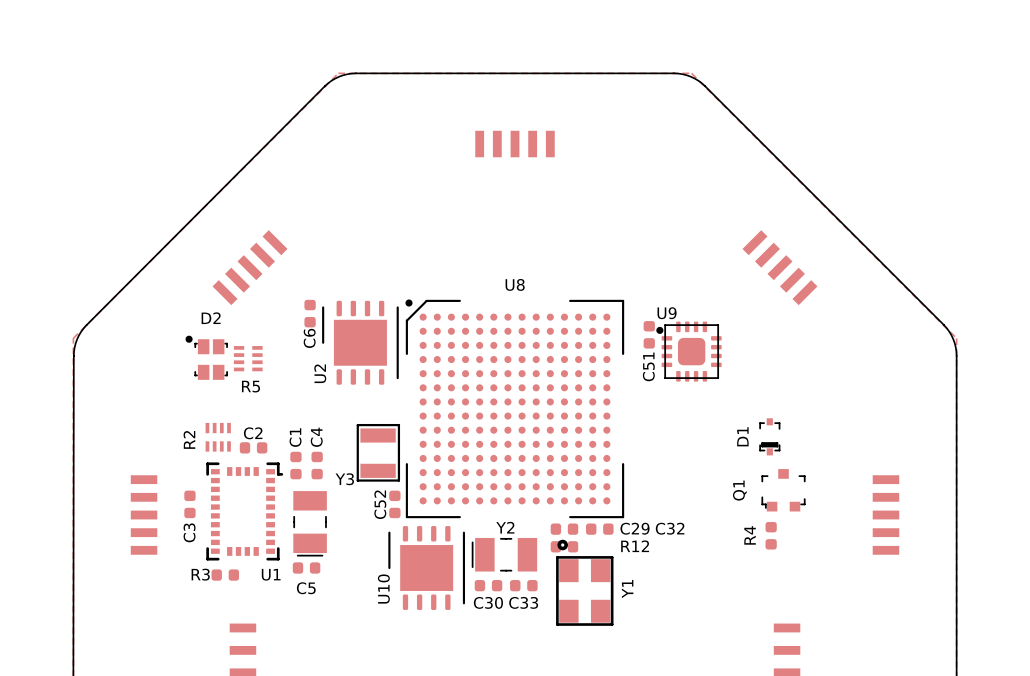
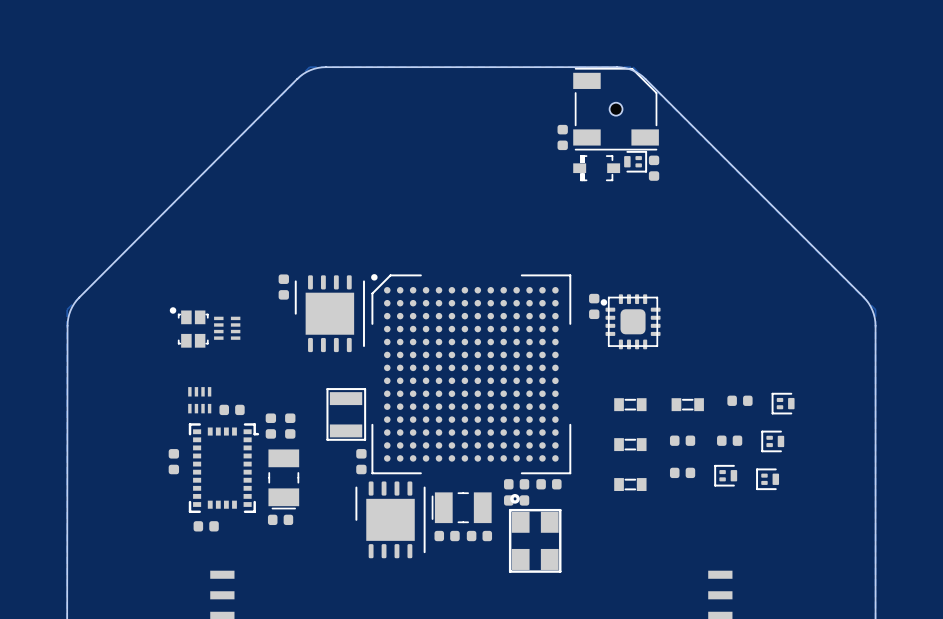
part: none -> (616, 109)
part: (515, 144) -> none
part: none -> (562, 137)
part: none -> (635, 161)
part: none -> (596, 168)
part: none -> (654, 168)
part: (250, 267) -> none
part: (779, 267) -> none
U8 name: U8 (515, 284) -> none
U9 name: U9 (667, 313) -> none
D2 name: D2 (211, 318) -> none
C6 name: C6 (309, 338) -> none
C51 name: C51 (648, 366) -> none
U2 name: U2 (320, 373) -> none
R5 name: R5 (250, 386) -> none
C2 name: C2 (253, 433) -> none
D1: (769, 436) -> none
C1 name: C1 (295, 437) -> none
C4 name: C4 (316, 437) -> none
part: none -> (739, 400)
R2 name: R2 (189, 439) -> none
part: none -> (783, 403)
part: none -> (630, 404)
part: none -> (687, 404)
Y3 name: Y3 (344, 479) -> none
part: none -> (682, 440)
part: none -> (729, 440)
part: none -> (772, 441)
part: none -> (630, 444)
Q1: (783, 490) -> none
C52 name: C52 (380, 504) -> none
part: (144, 515) -> none
part: (885, 515) -> none
part: none -> (682, 472)
part: none -> (725, 475)
part: none -> (767, 479)
Y2 name: Y2 (505, 527) -> none
C29 name: C29 (635, 528) -> none
C32 name: C32 (670, 528) -> none
part: none -> (630, 484)
C3 name: C3 (189, 532) -> none
R4: (771, 535) -> none
R12 name: R12 (635, 546) -> none
R3 name: R3 (200, 574) -> none
U1 name: U1 (271, 574) -> none
C5 name: C5 (306, 588) -> none
U10 name: U10 (383, 589) -> none
Y1 name: Y1 (627, 589) -> none
C30 name: C30 (488, 602) -> none
C33 name: C33 (523, 602) -> none

